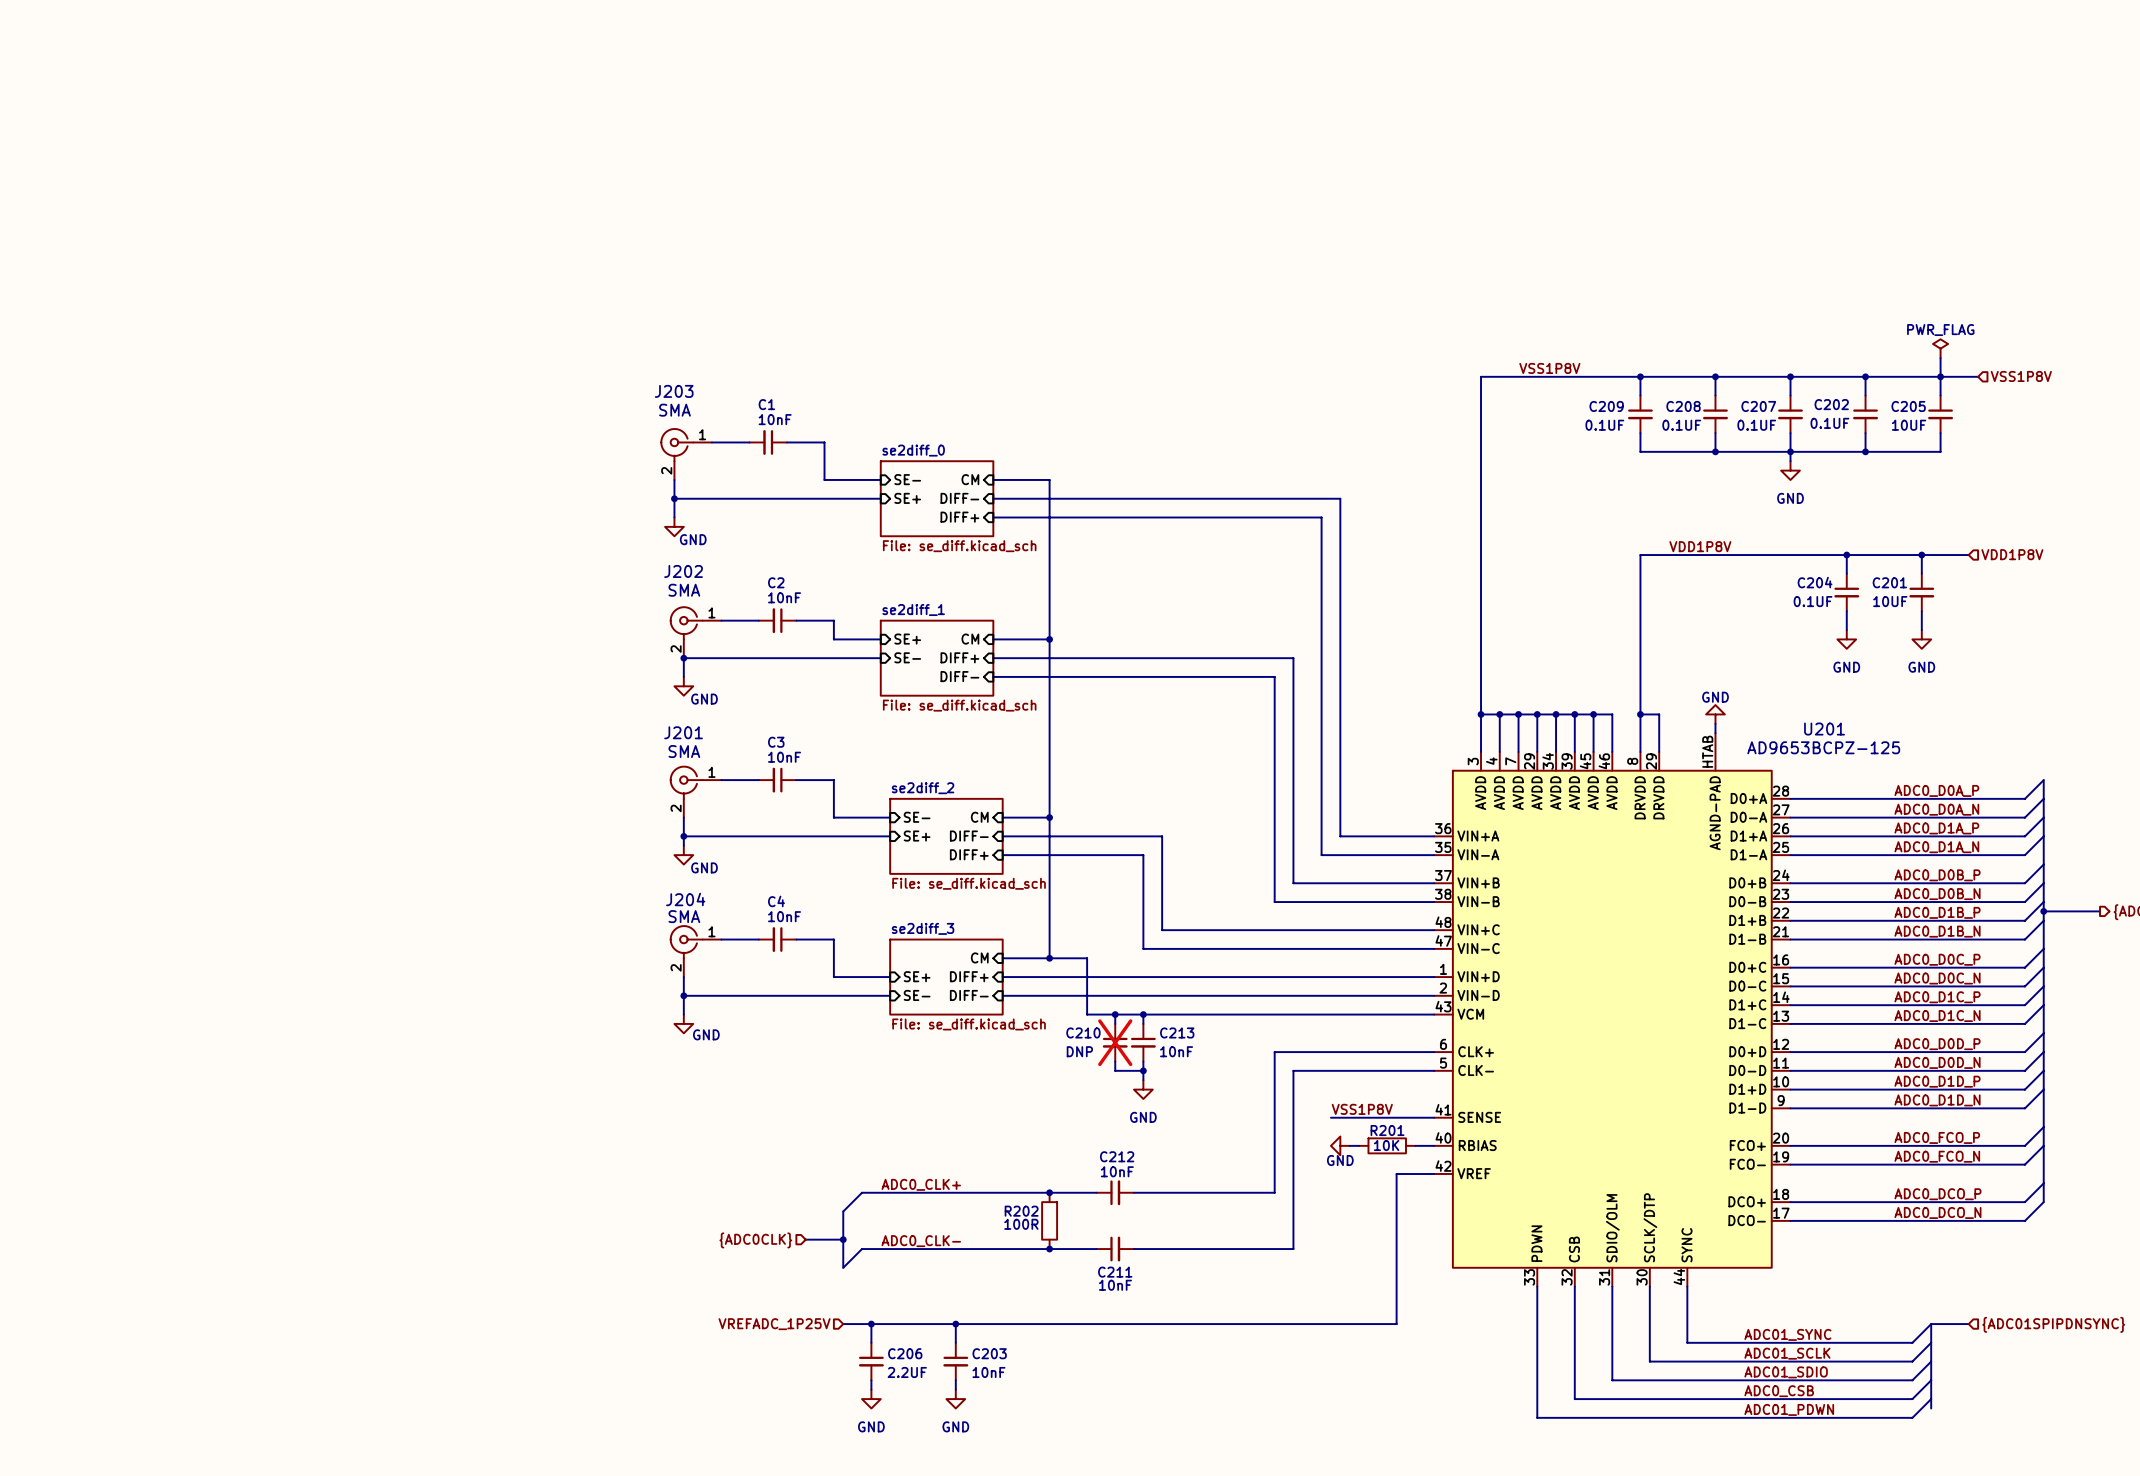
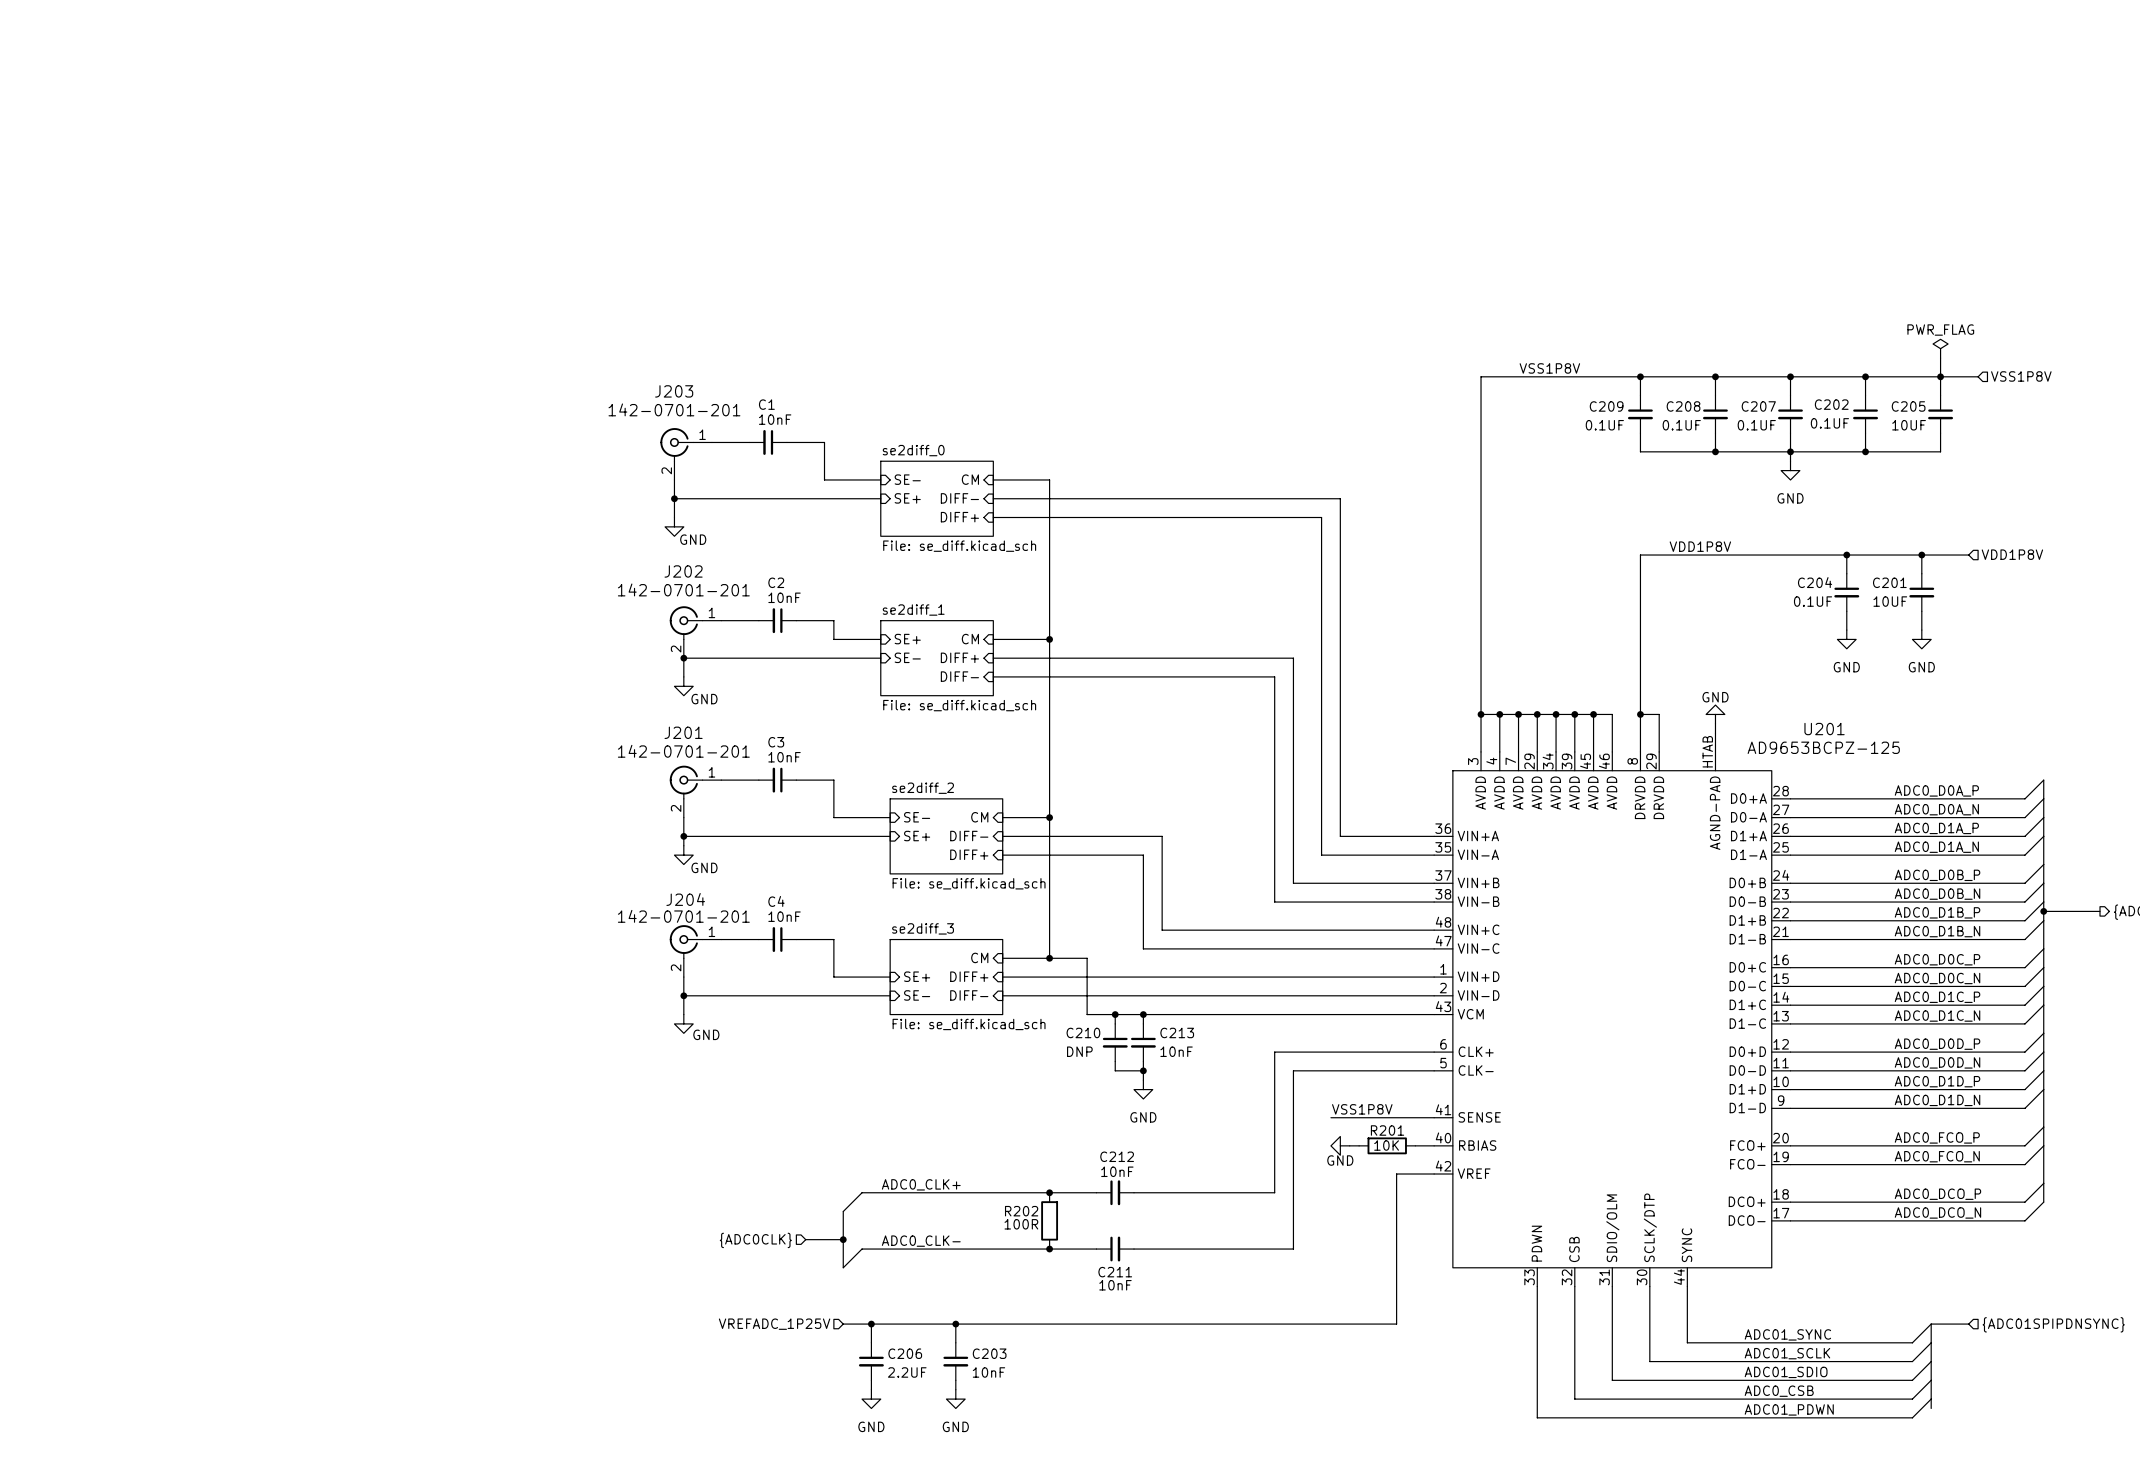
J203 value: SMA (674, 410) -> 142-0701-201 (674, 409)
J202 value: SMA (684, 590) -> 142-0701-201 (683, 589)
J201 value: SMA (684, 751) -> 142-0701-201 (683, 751)
J204 value: SMA (684, 916) -> 142-0701-201 (683, 916)
C210 do-not-place cross: (1115, 1042) -> none

